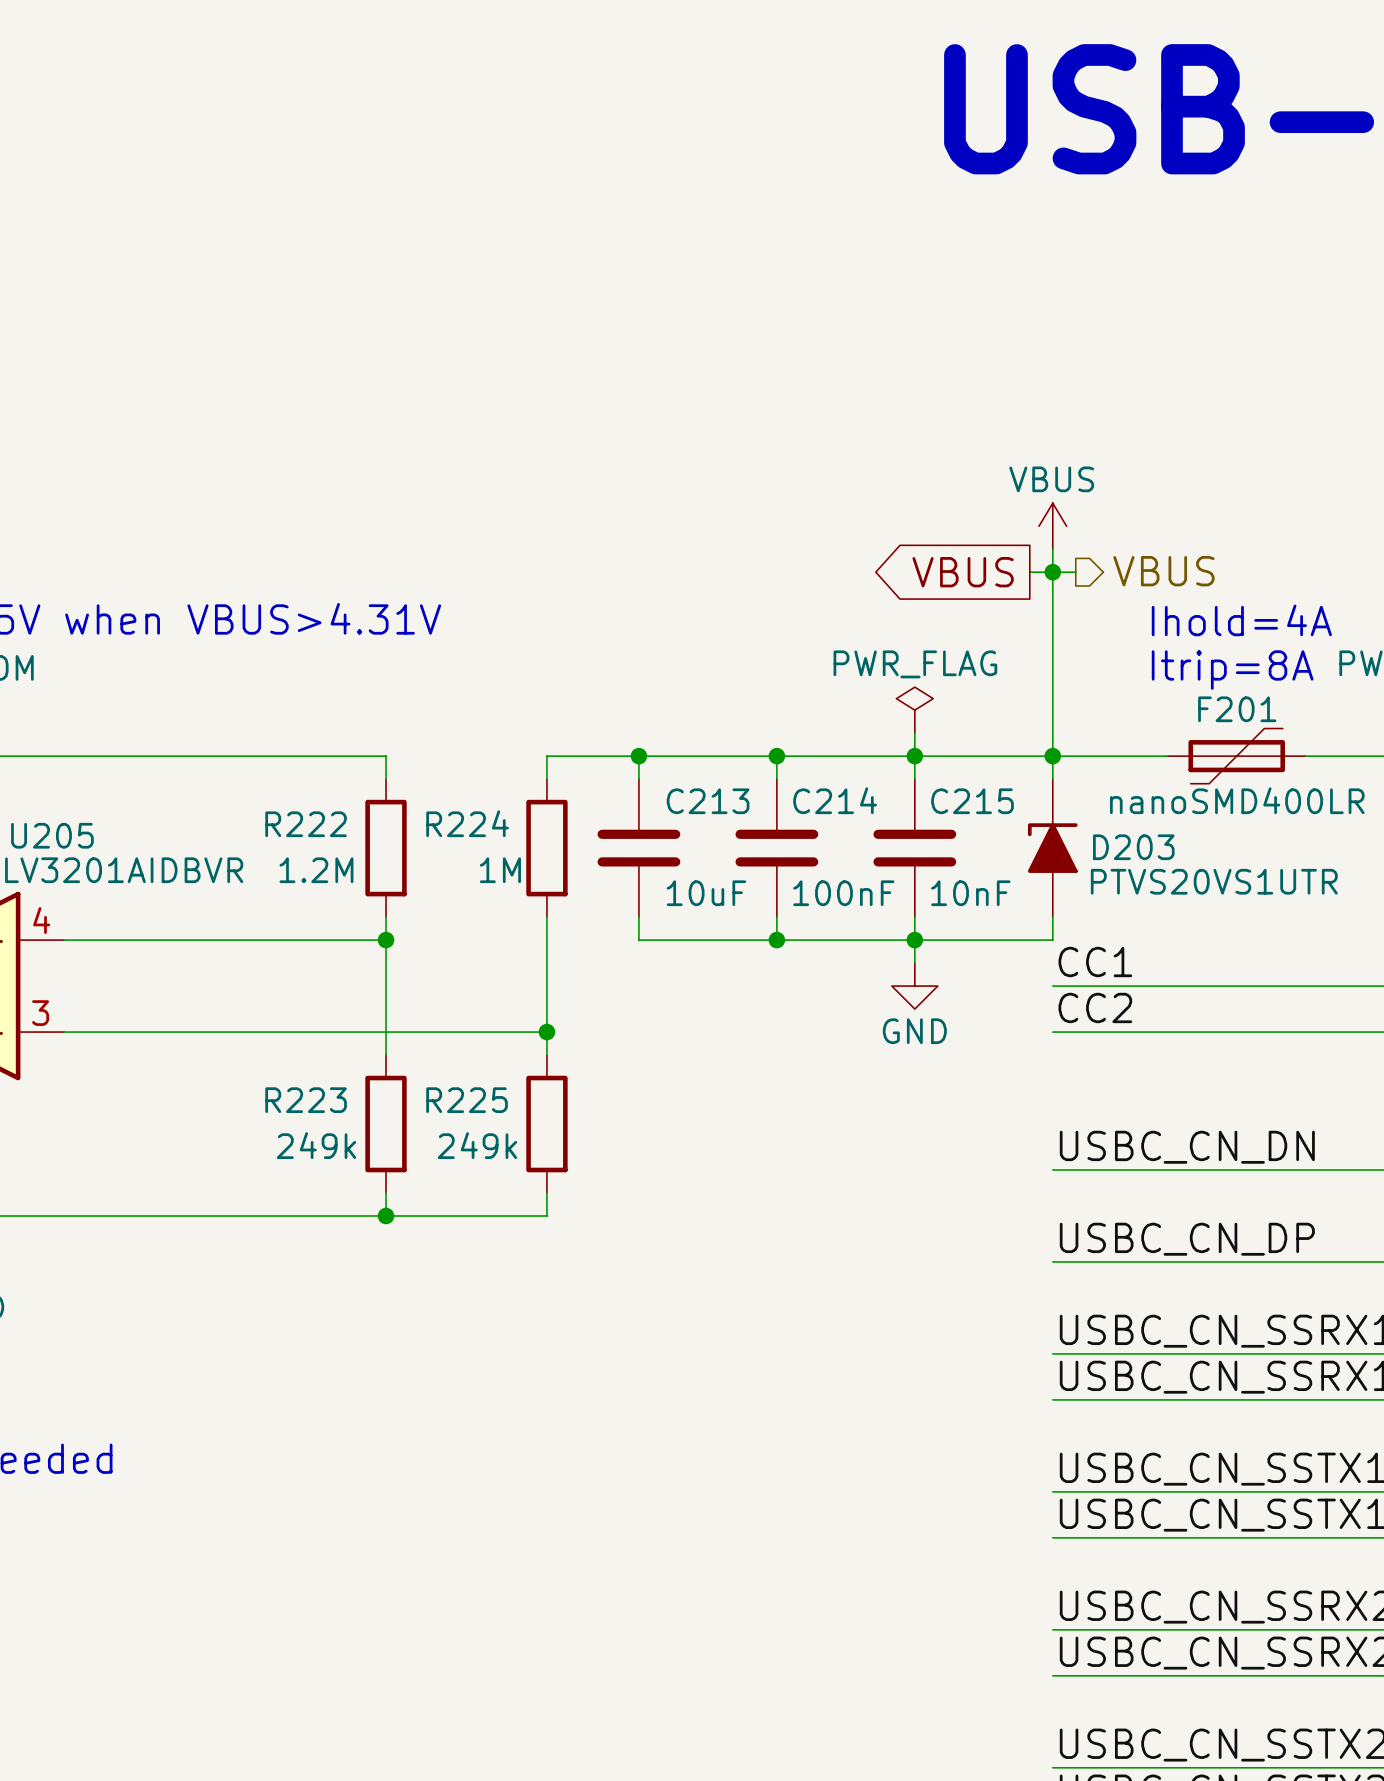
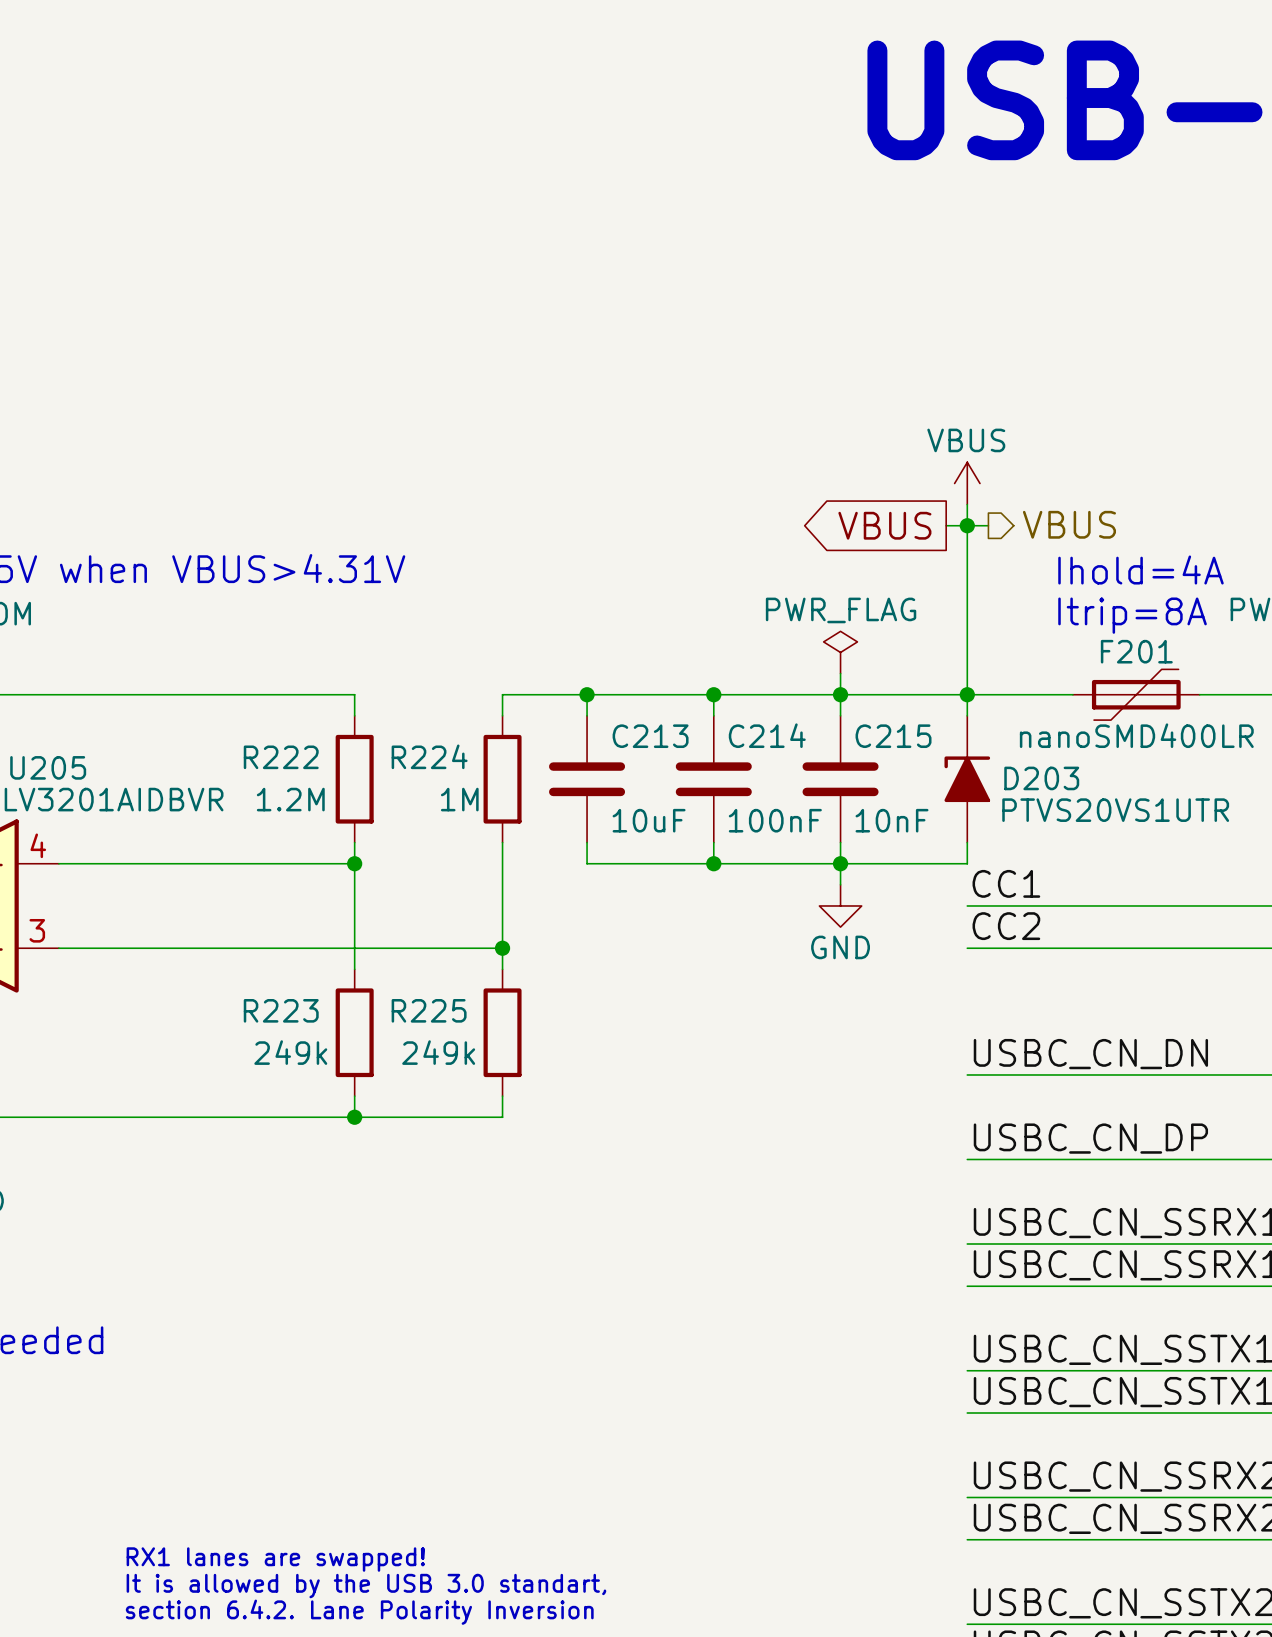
text: none -> RX1 lanes are swapped! (275, 1559)
text: none -> It is allowed by the USB 3.0 standart, (366, 1586)
text: none -> section 6.4.2. Lane Polarity Inversion (359, 1612)

